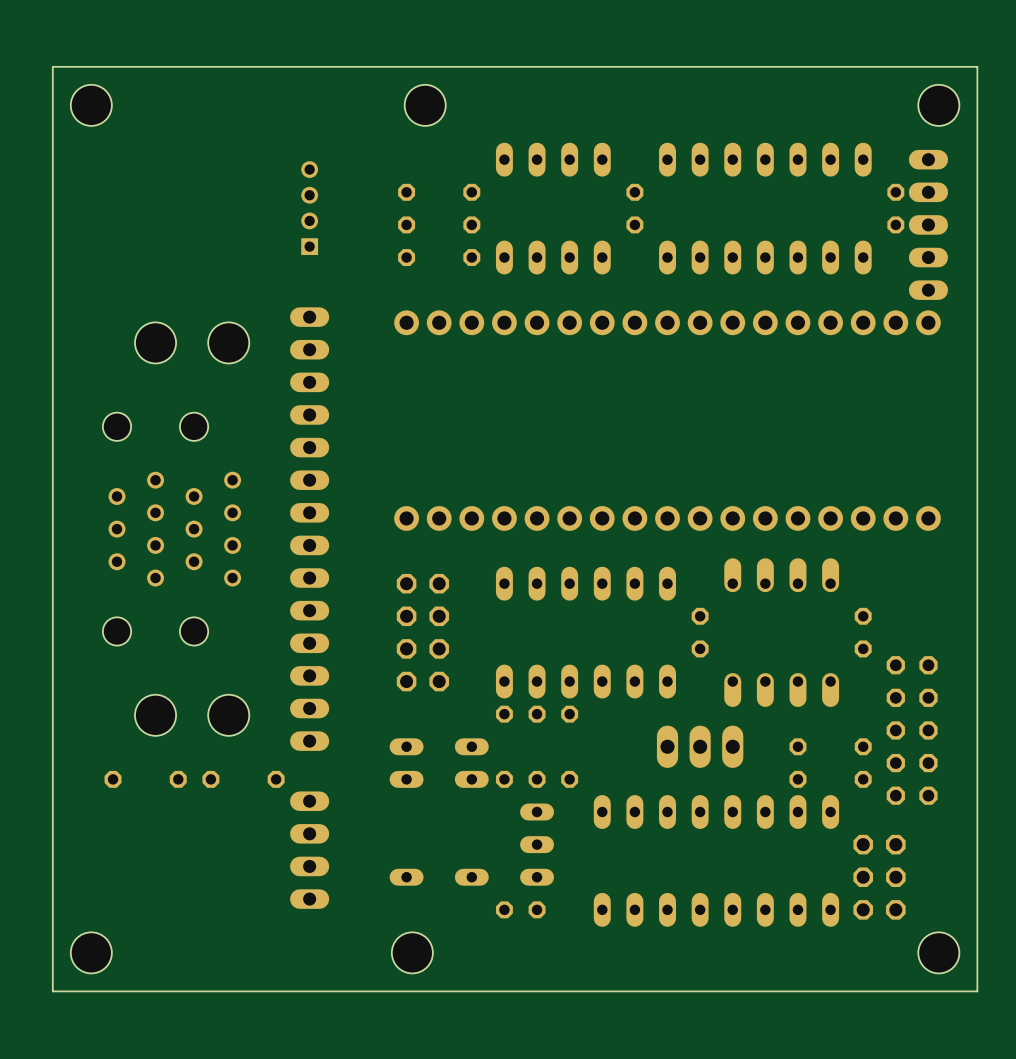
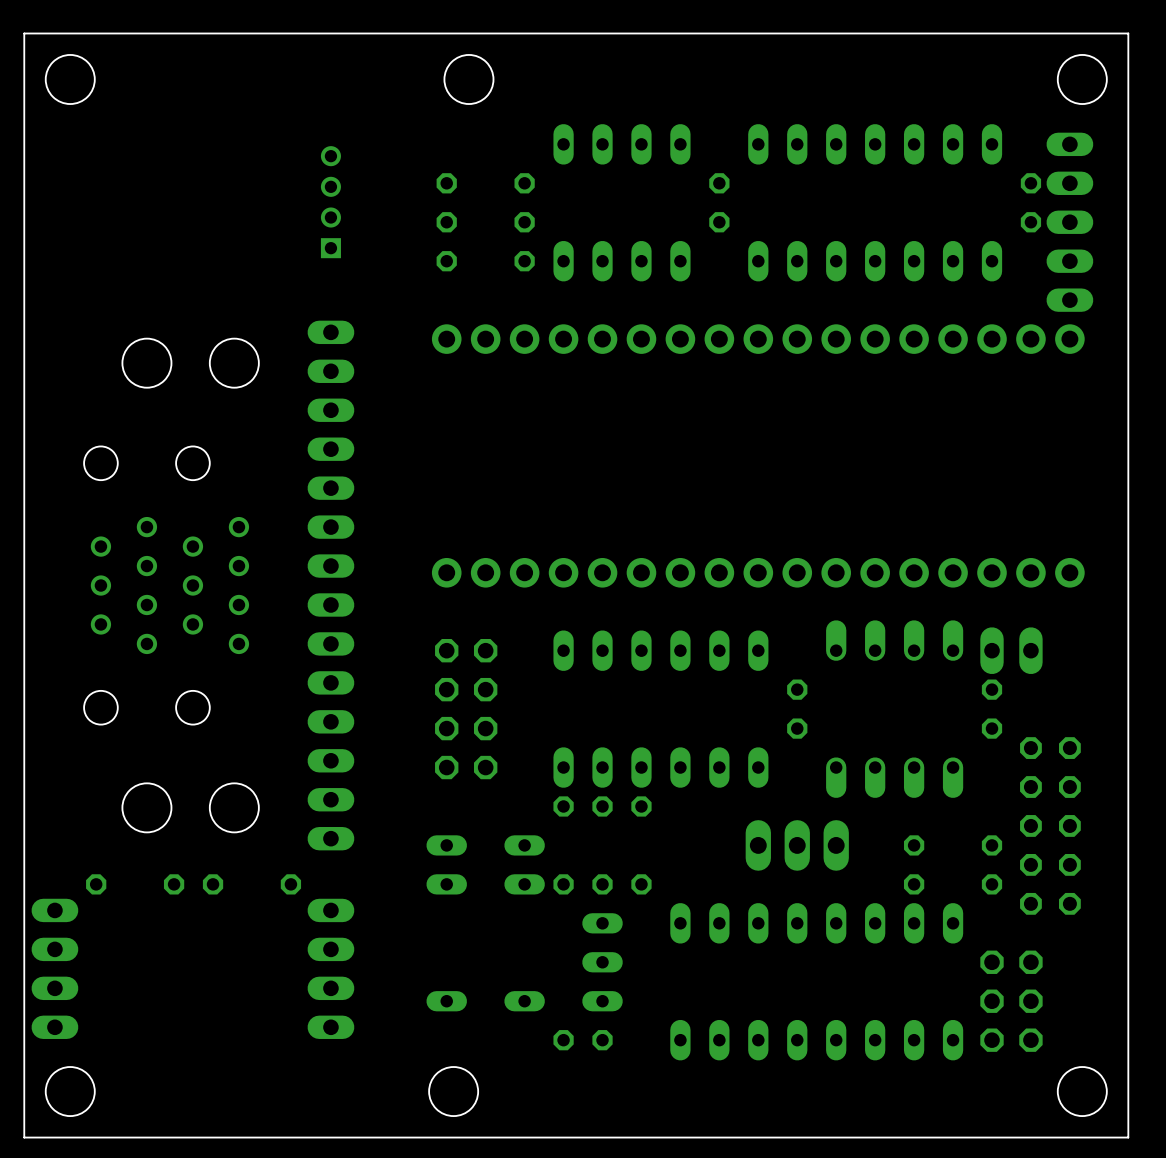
part: none -> (1011, 650)
part: none -> (54, 968)

